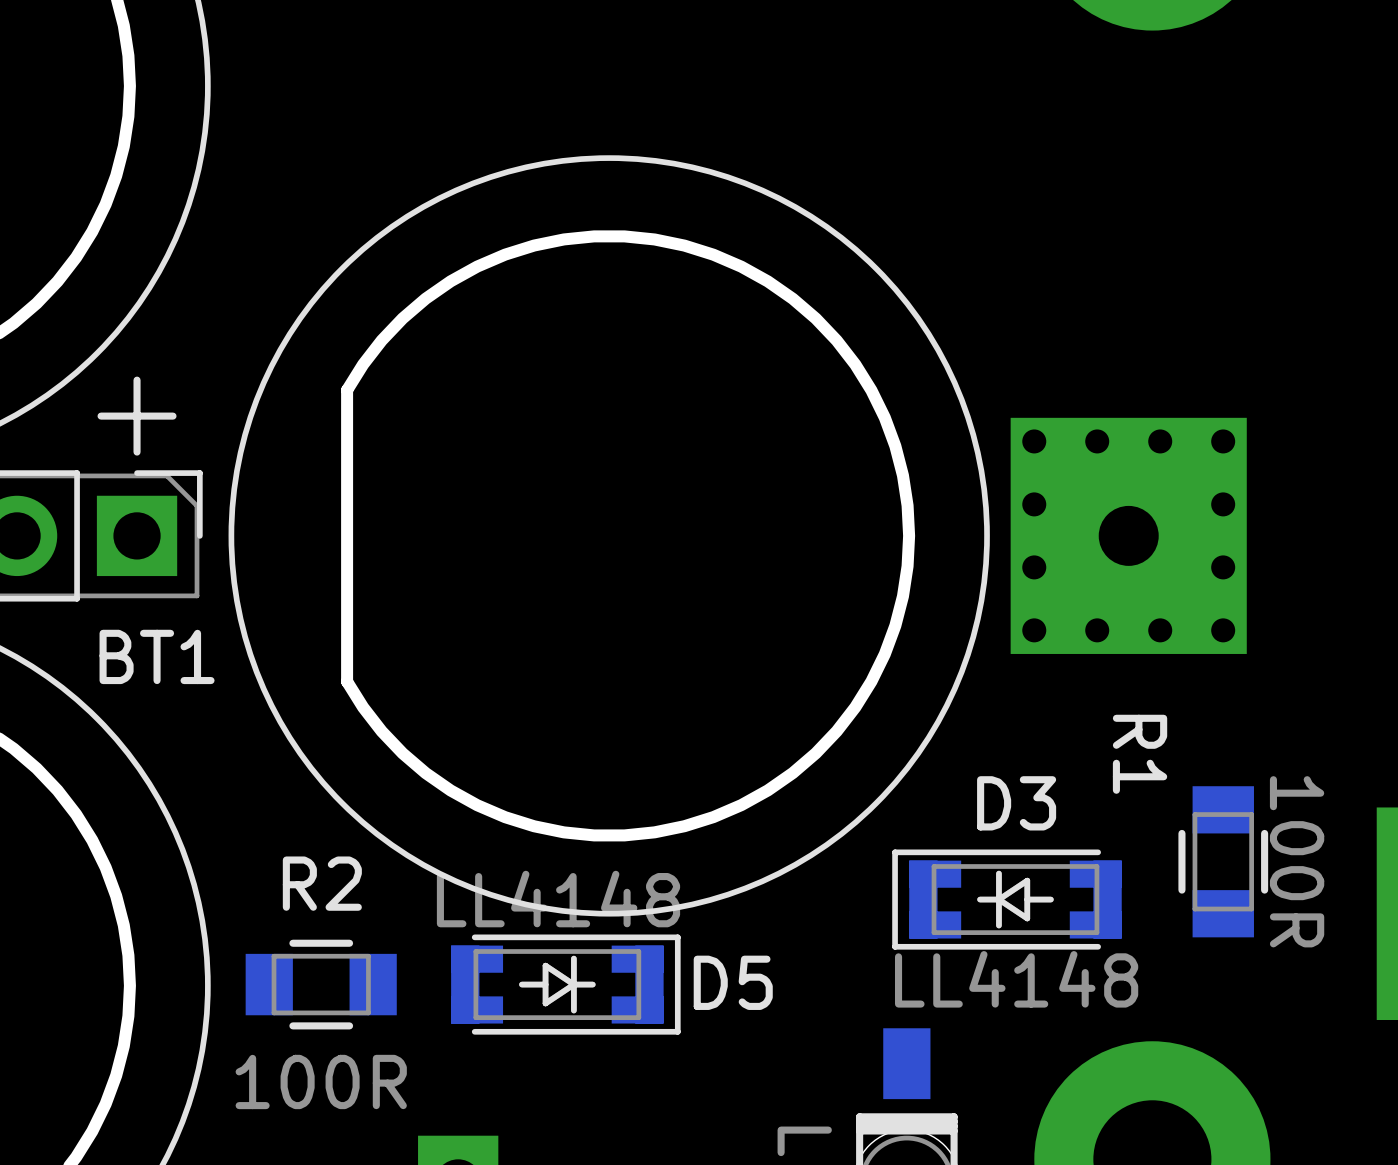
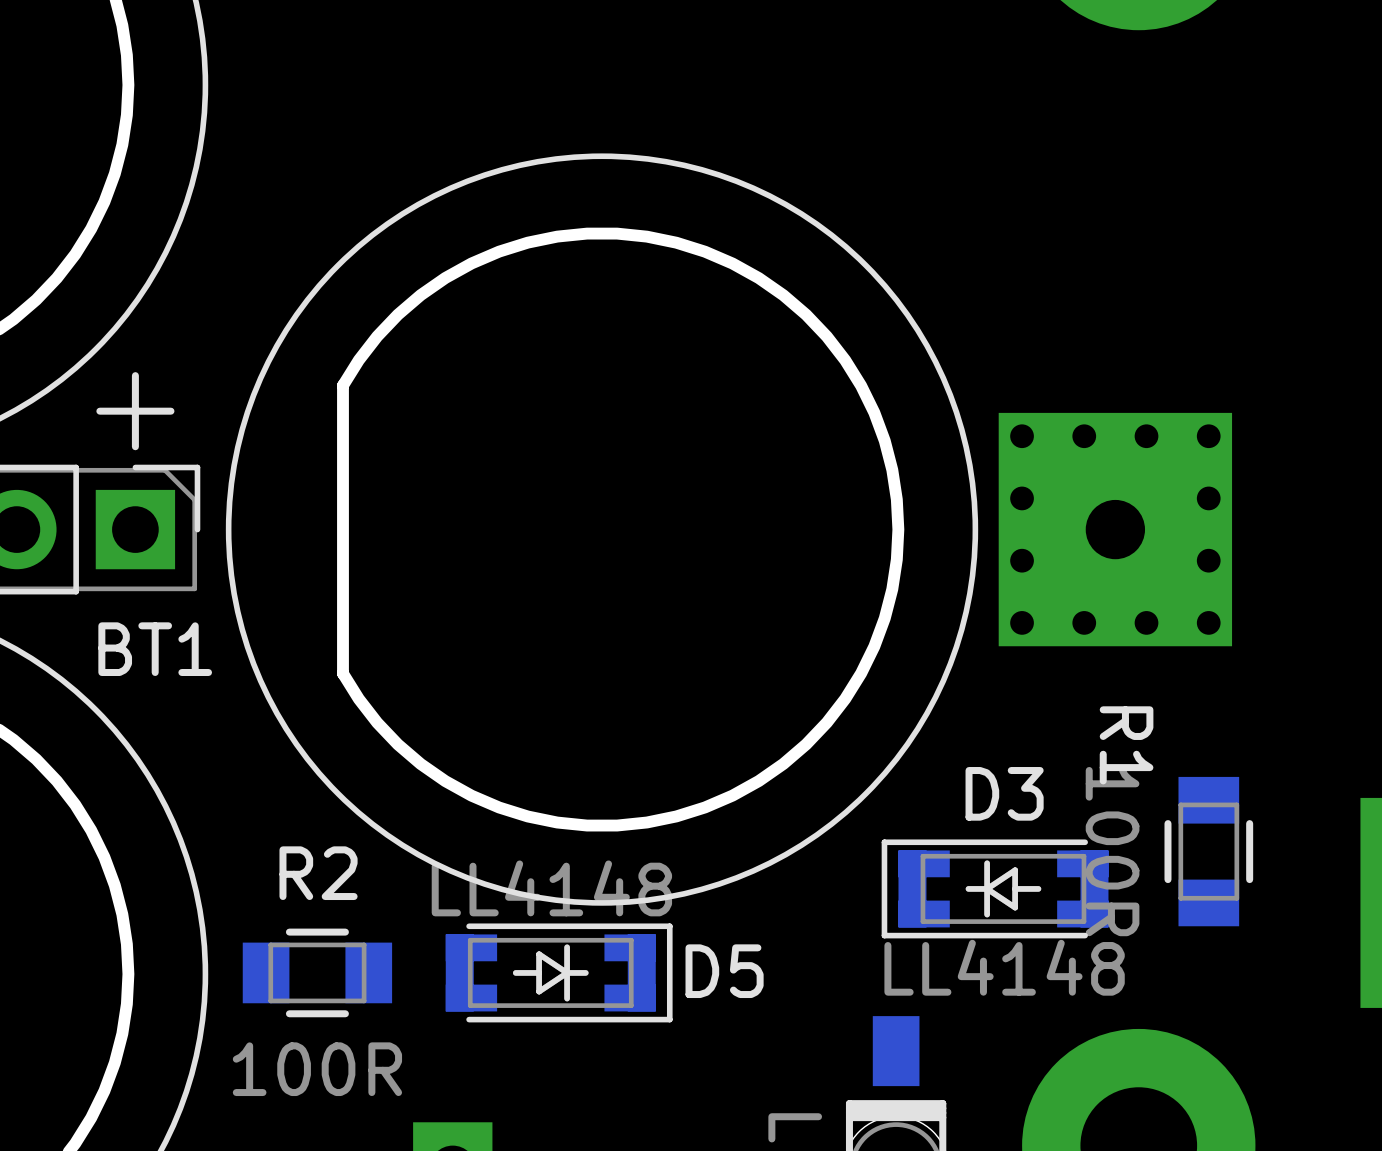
R1 value position: 100R (1297, 861) -> 100R (1112, 851)

